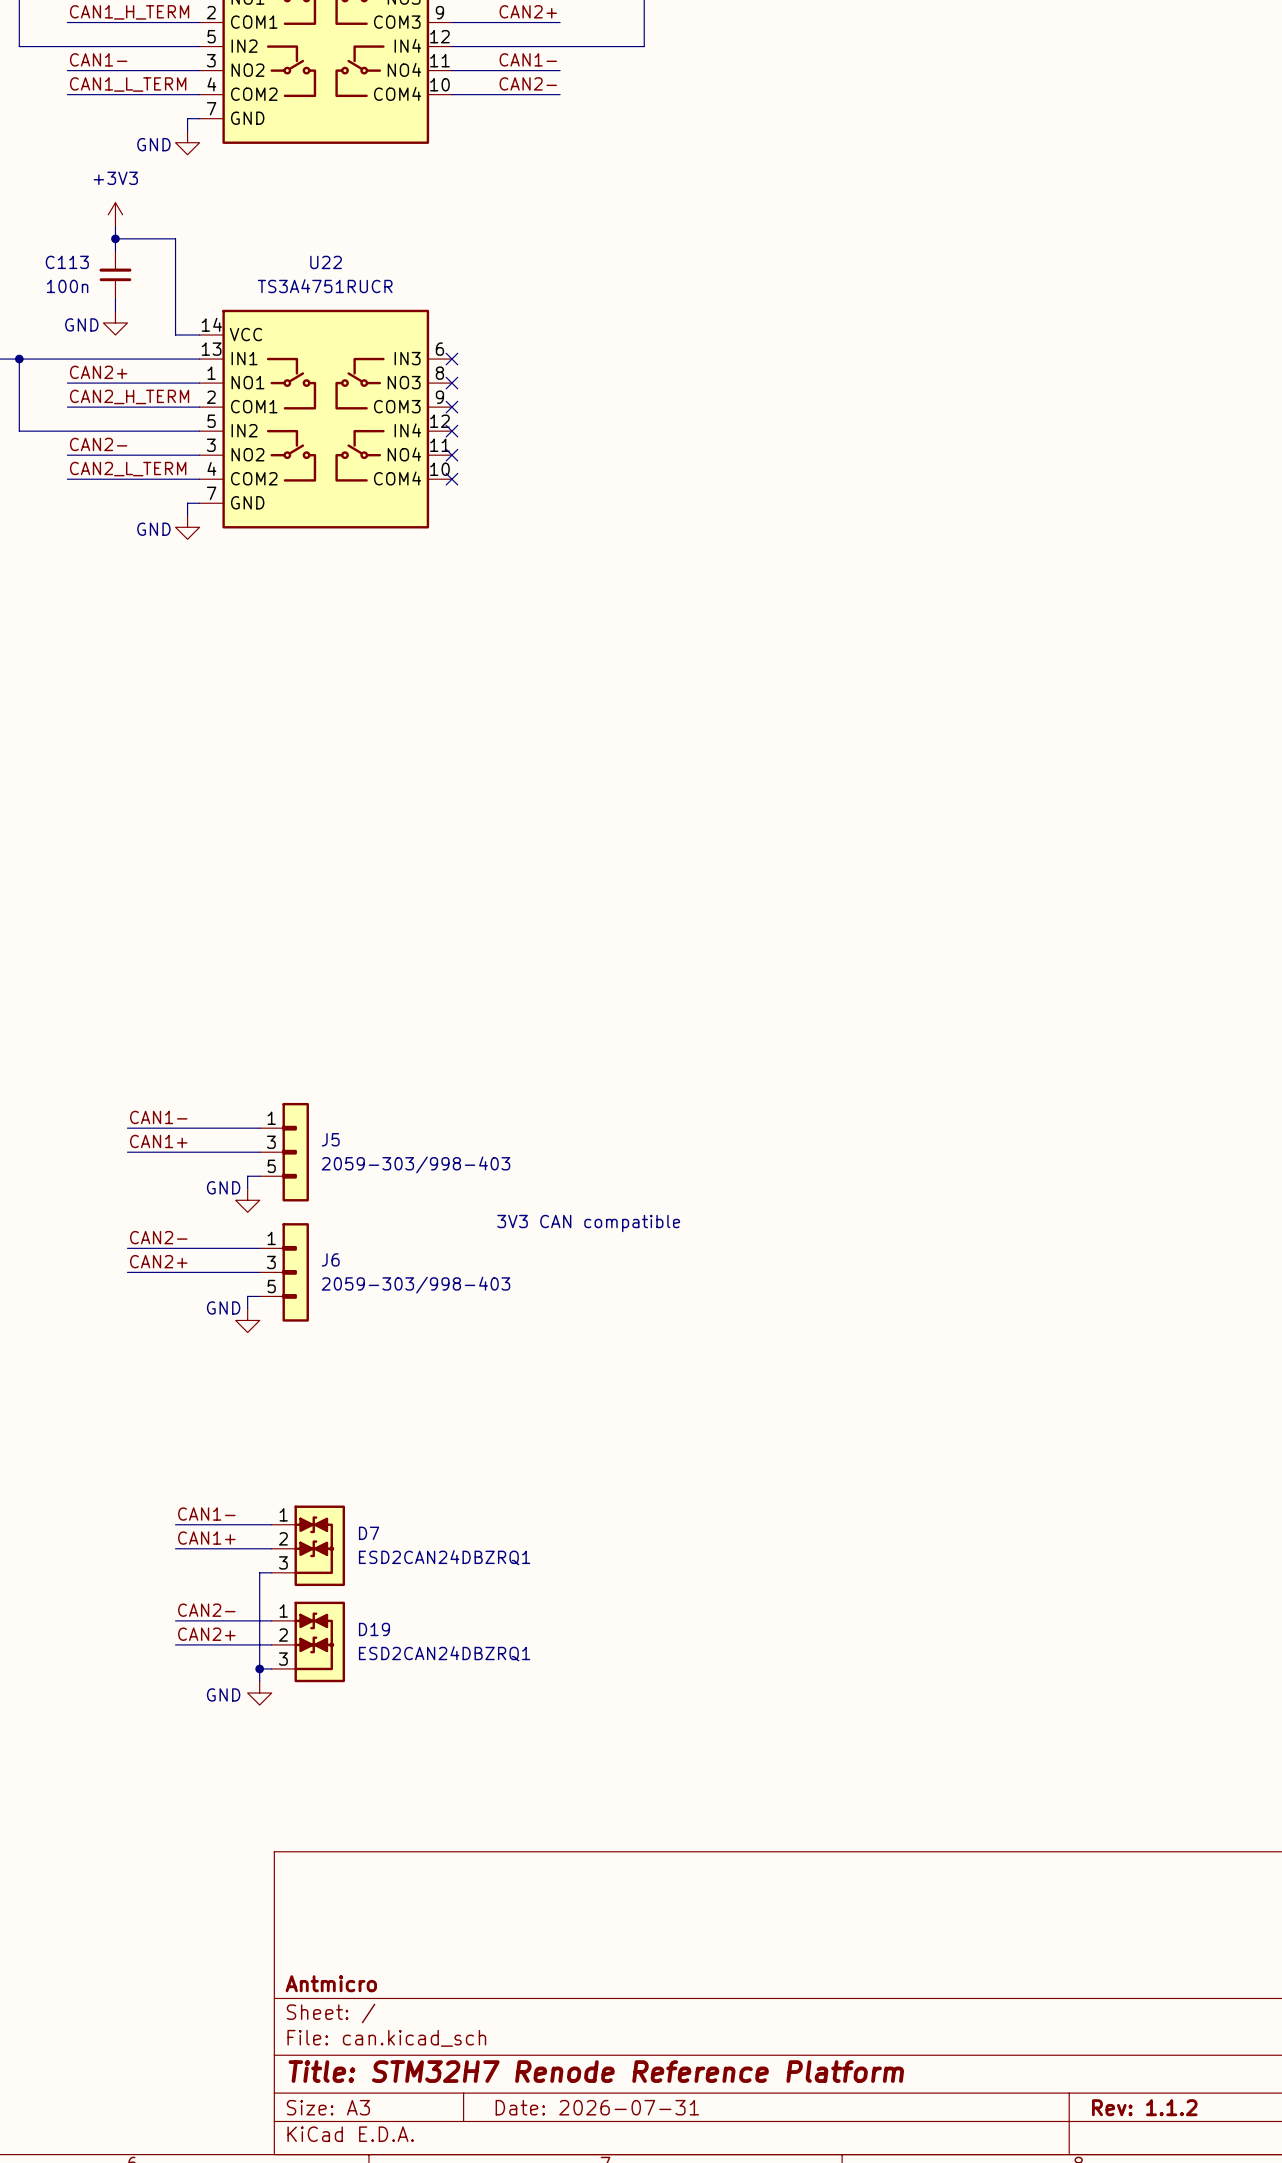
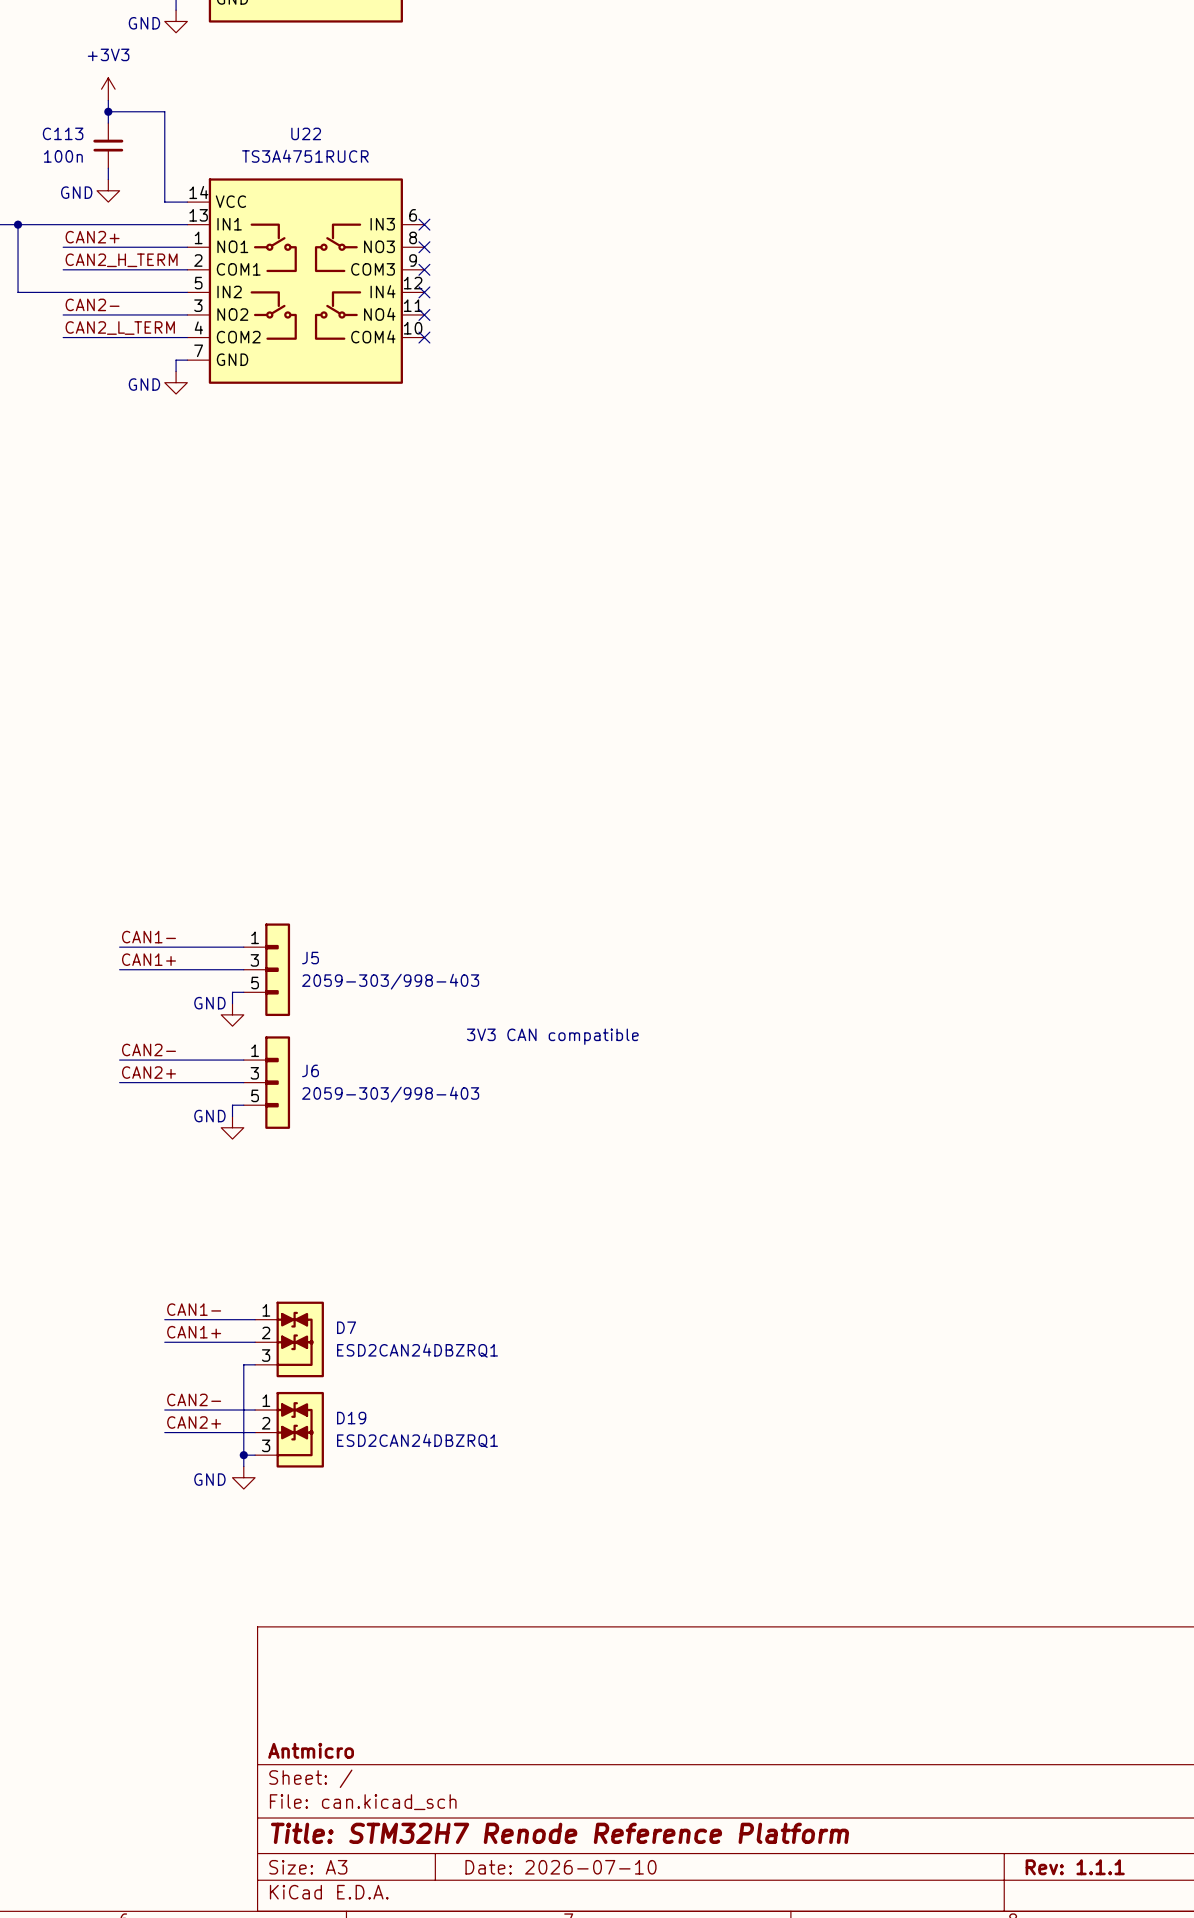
title block: Date: 2026-07-31 (597, 2107) -> Date: 2026-07-10 (561, 1867)
title block: Rev: 1.1.2 (1144, 2107) -> Rev: 1.1.1 (1075, 1867)

